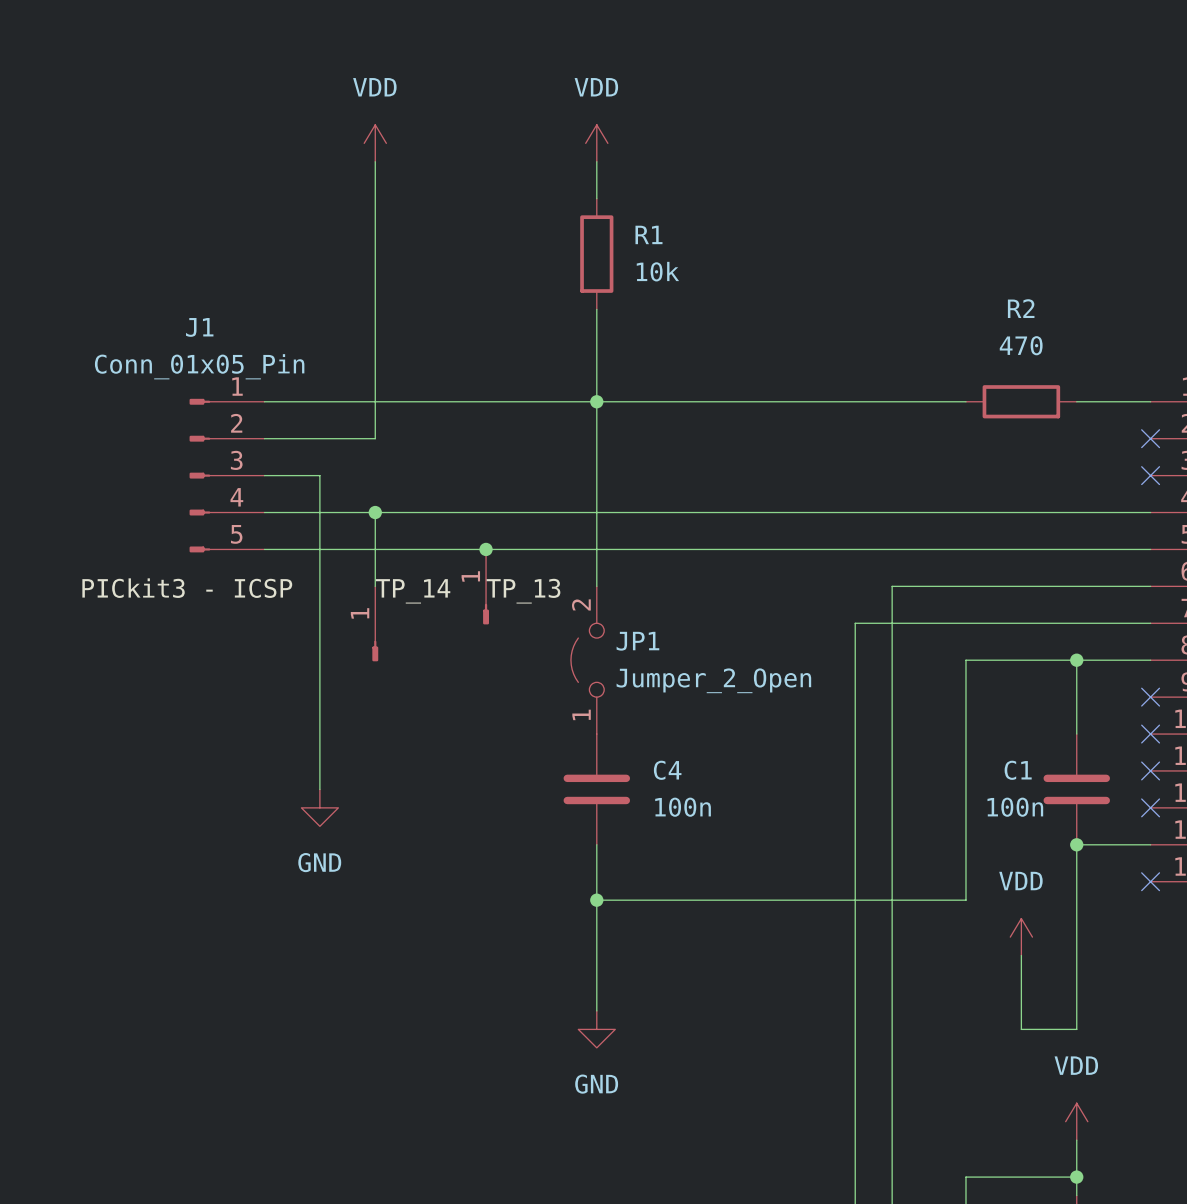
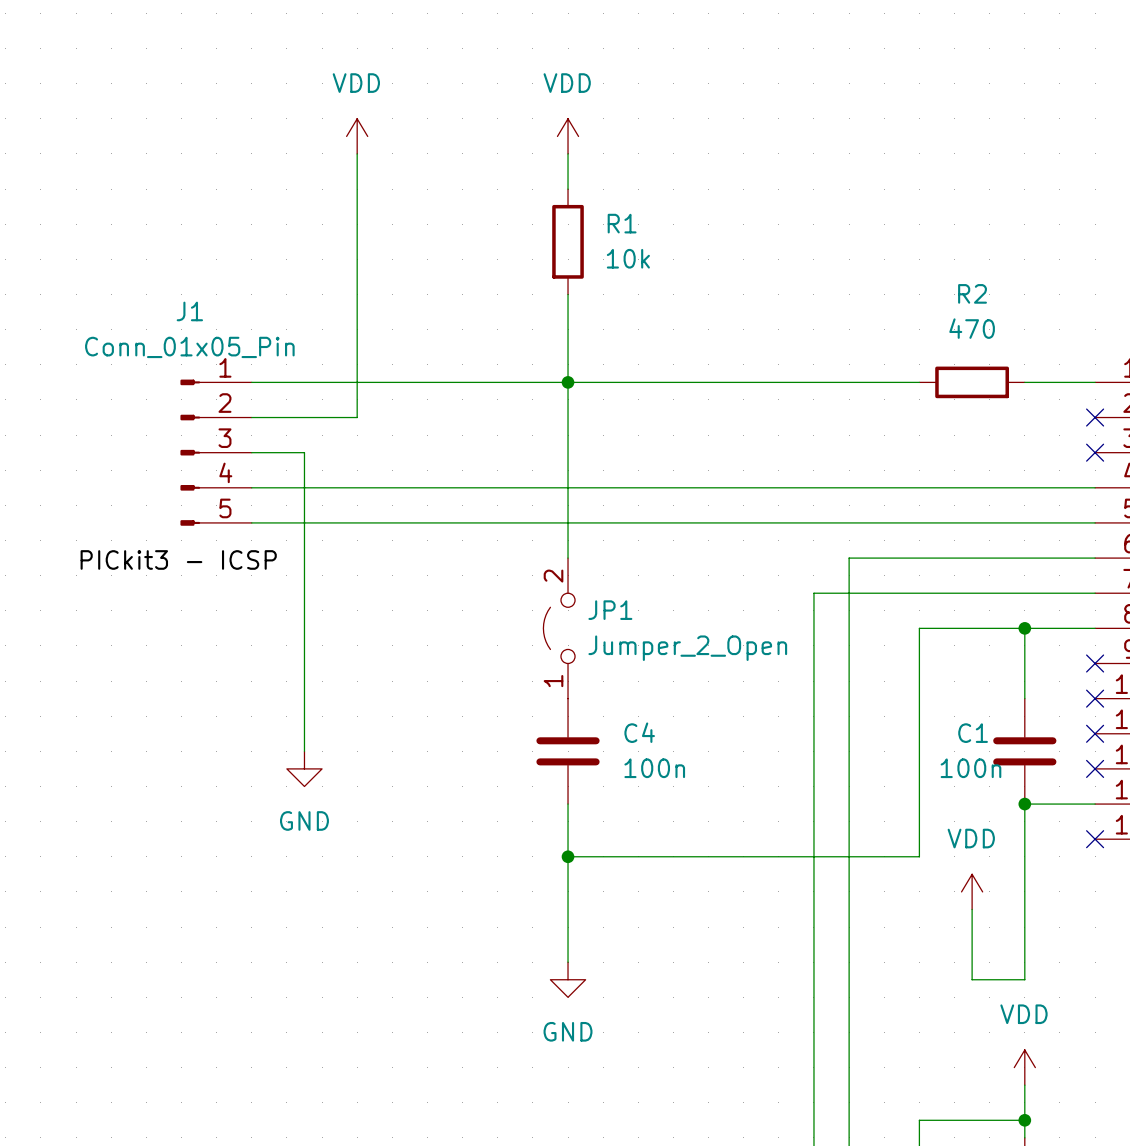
wire: (375, 512) (375, 586) -> none
junction: (375, 512) -> none
junction: (486, 549) -> none
part: (486, 586) -> none
label: TP_14 (413, 591) -> none
label: TP_13 (523, 591) -> none
part: (375, 623) -> none

